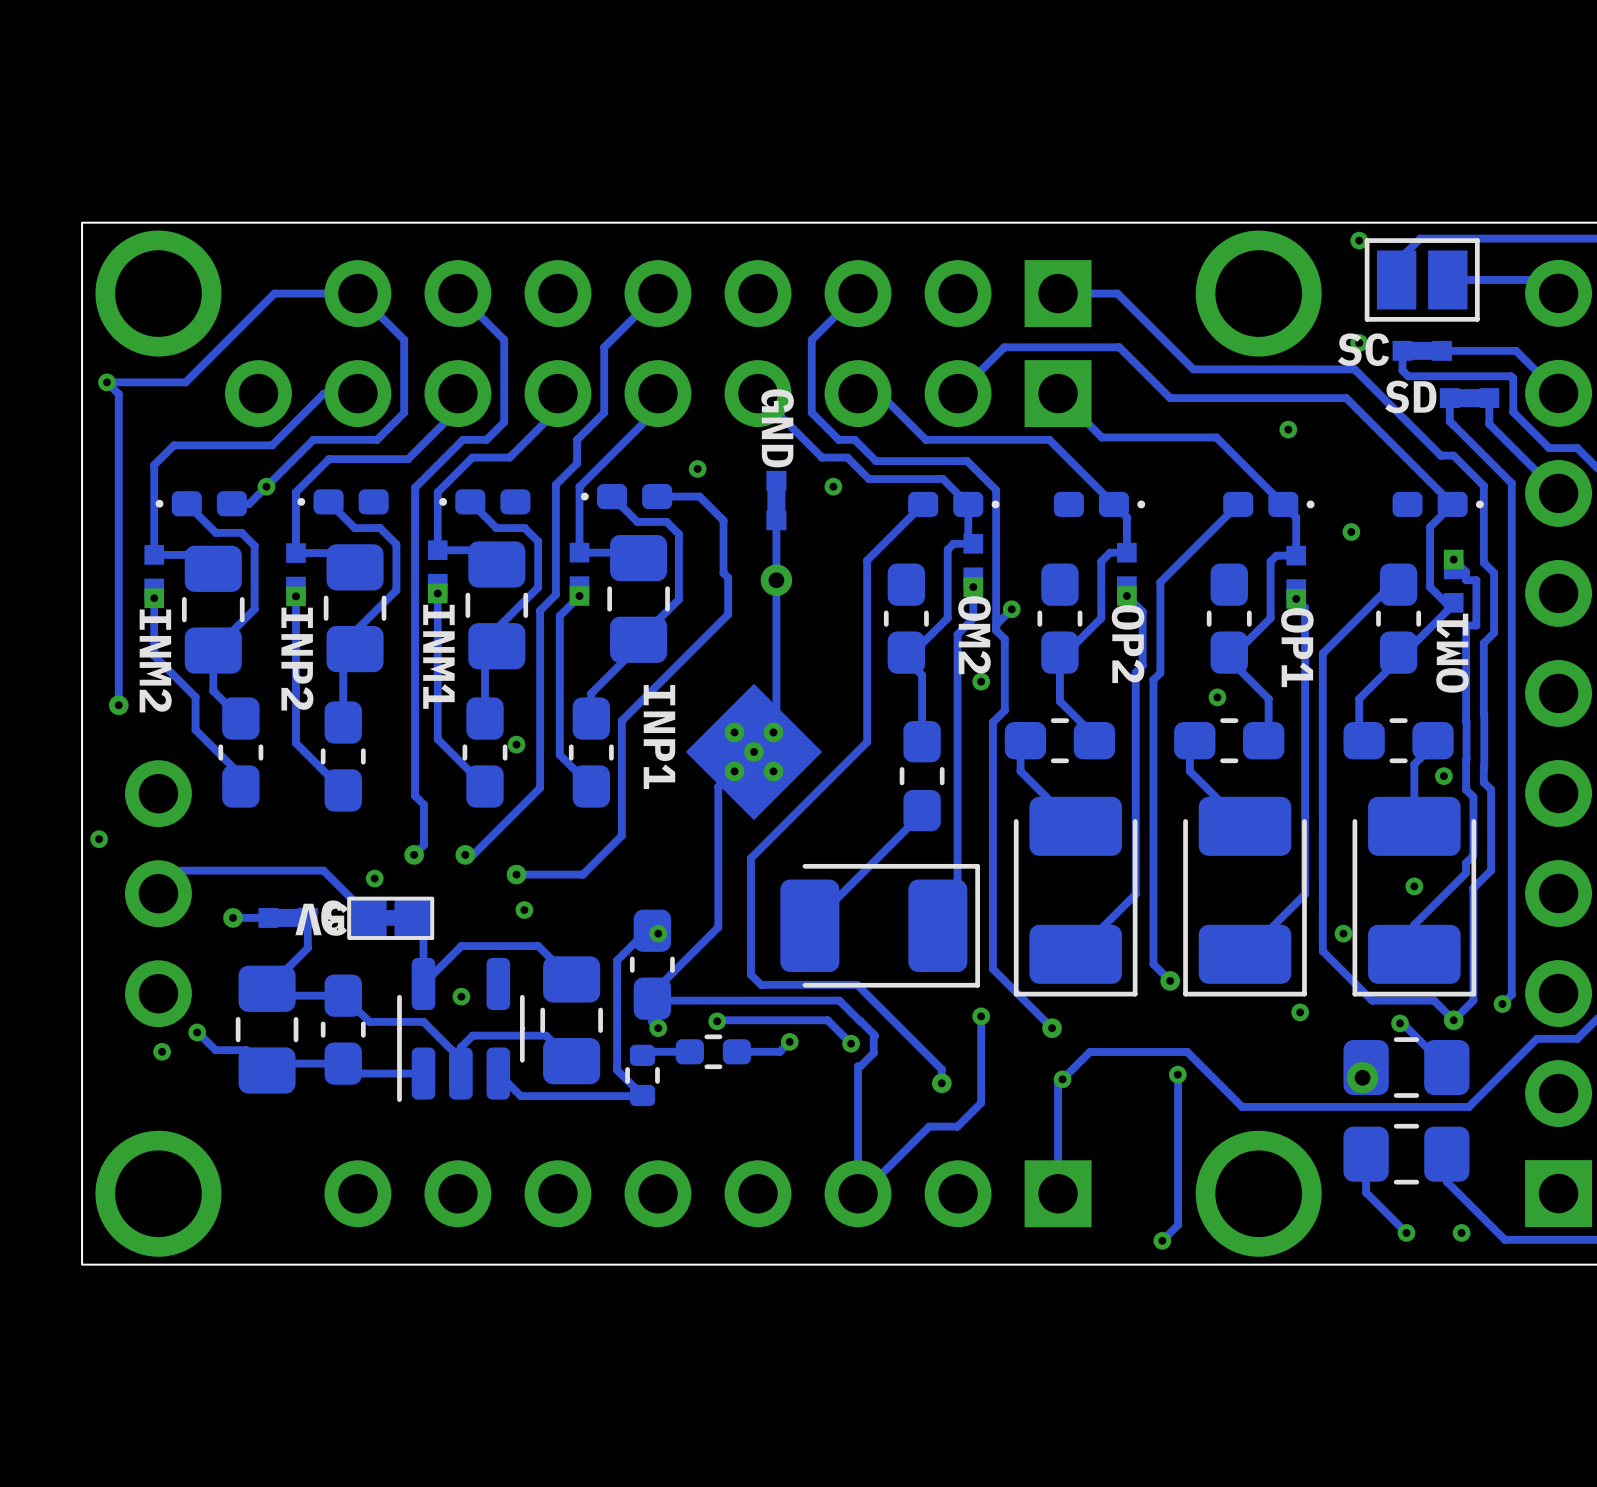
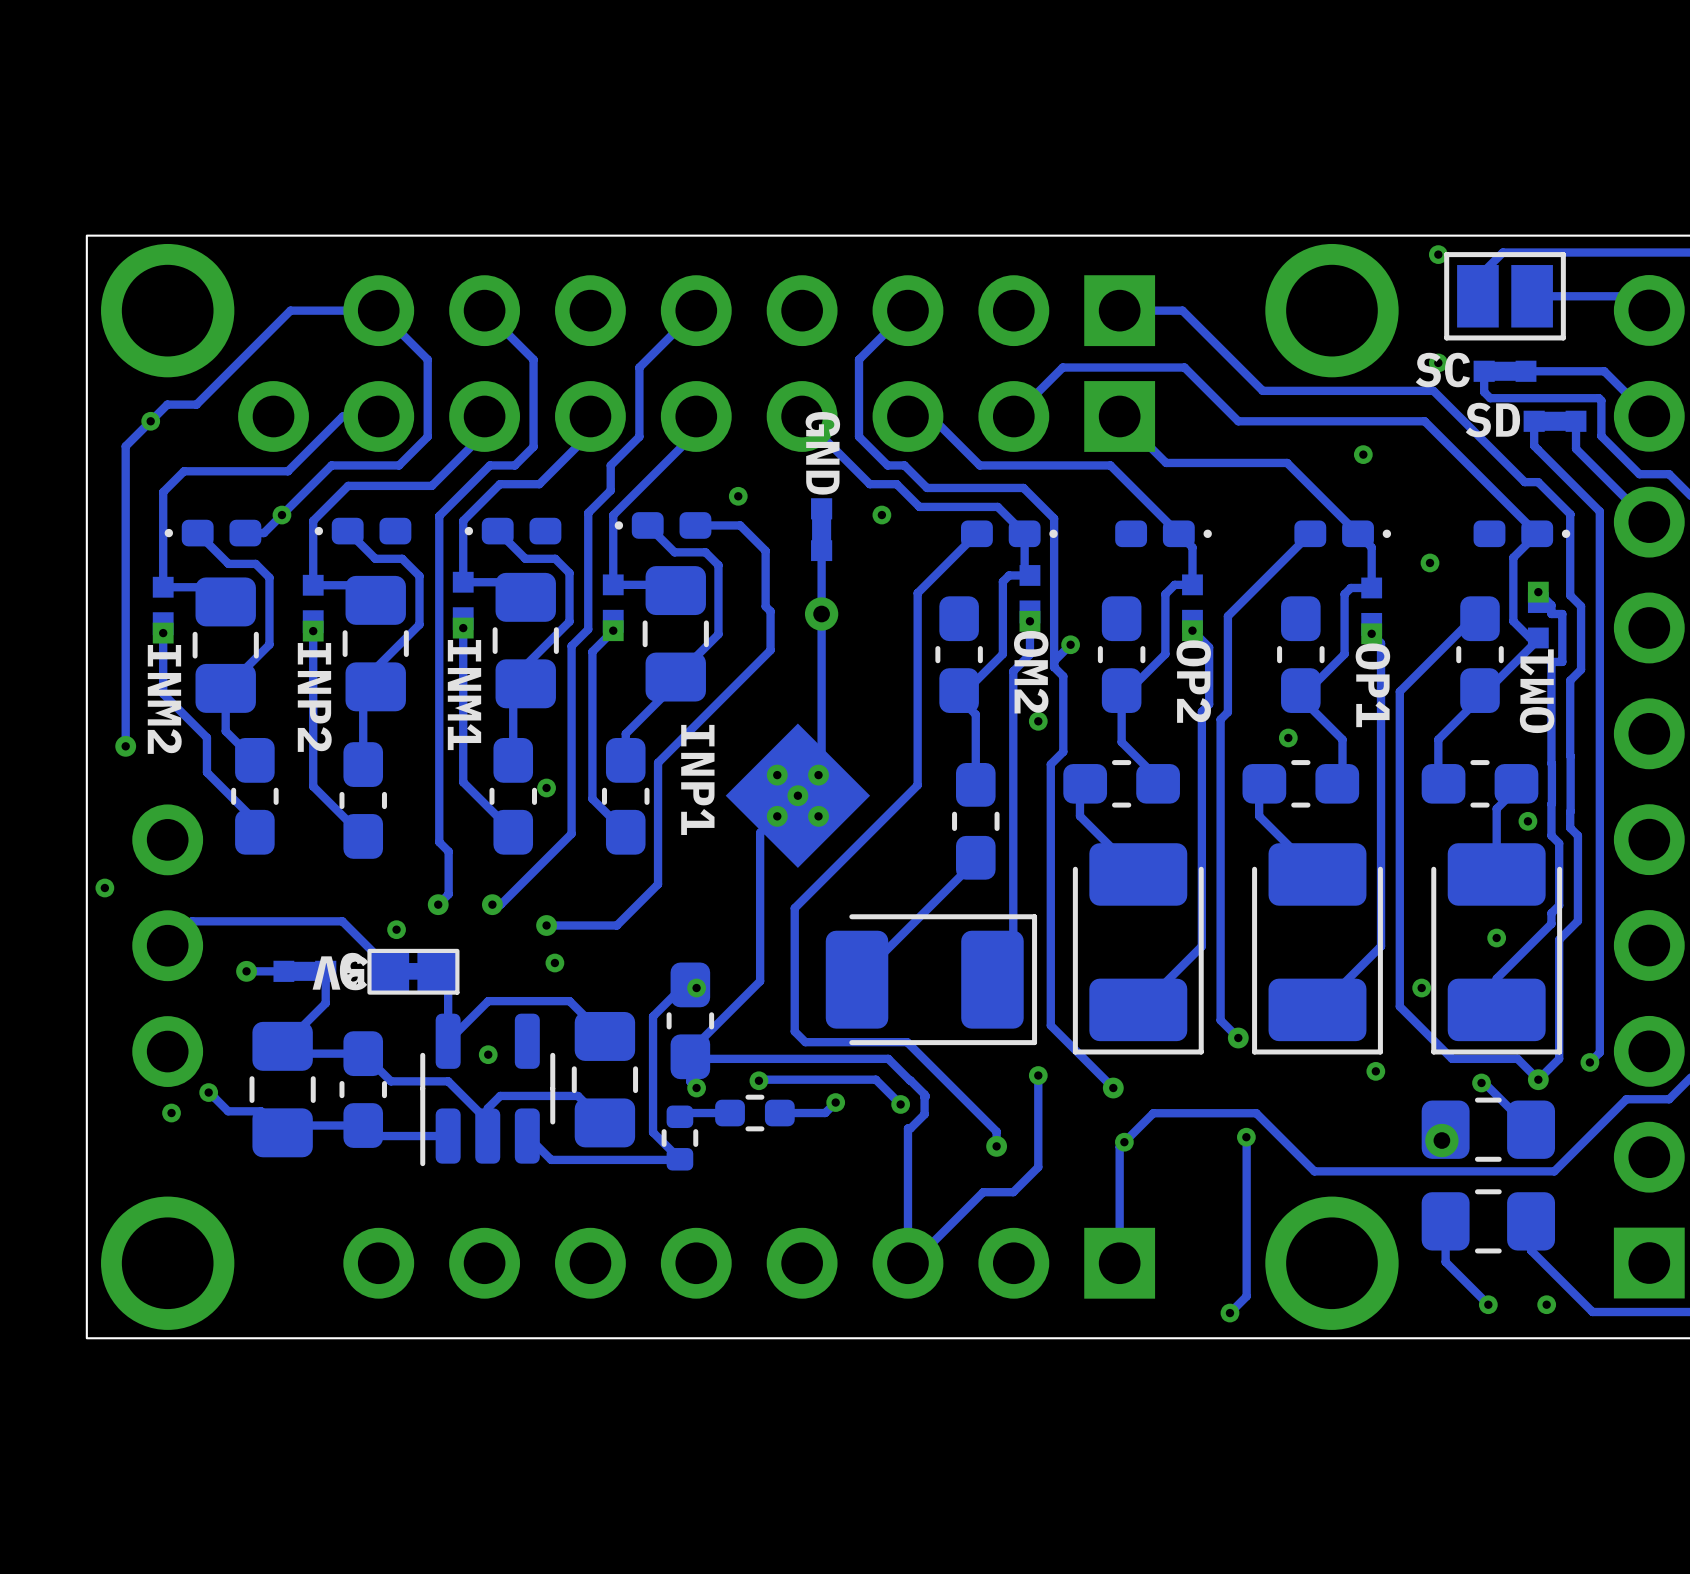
via position: (106, 382) -> (150, 421)
track: (158, 382) (106, 382) (118, 394) (118, 421) -> (167, 404) (125, 446)

